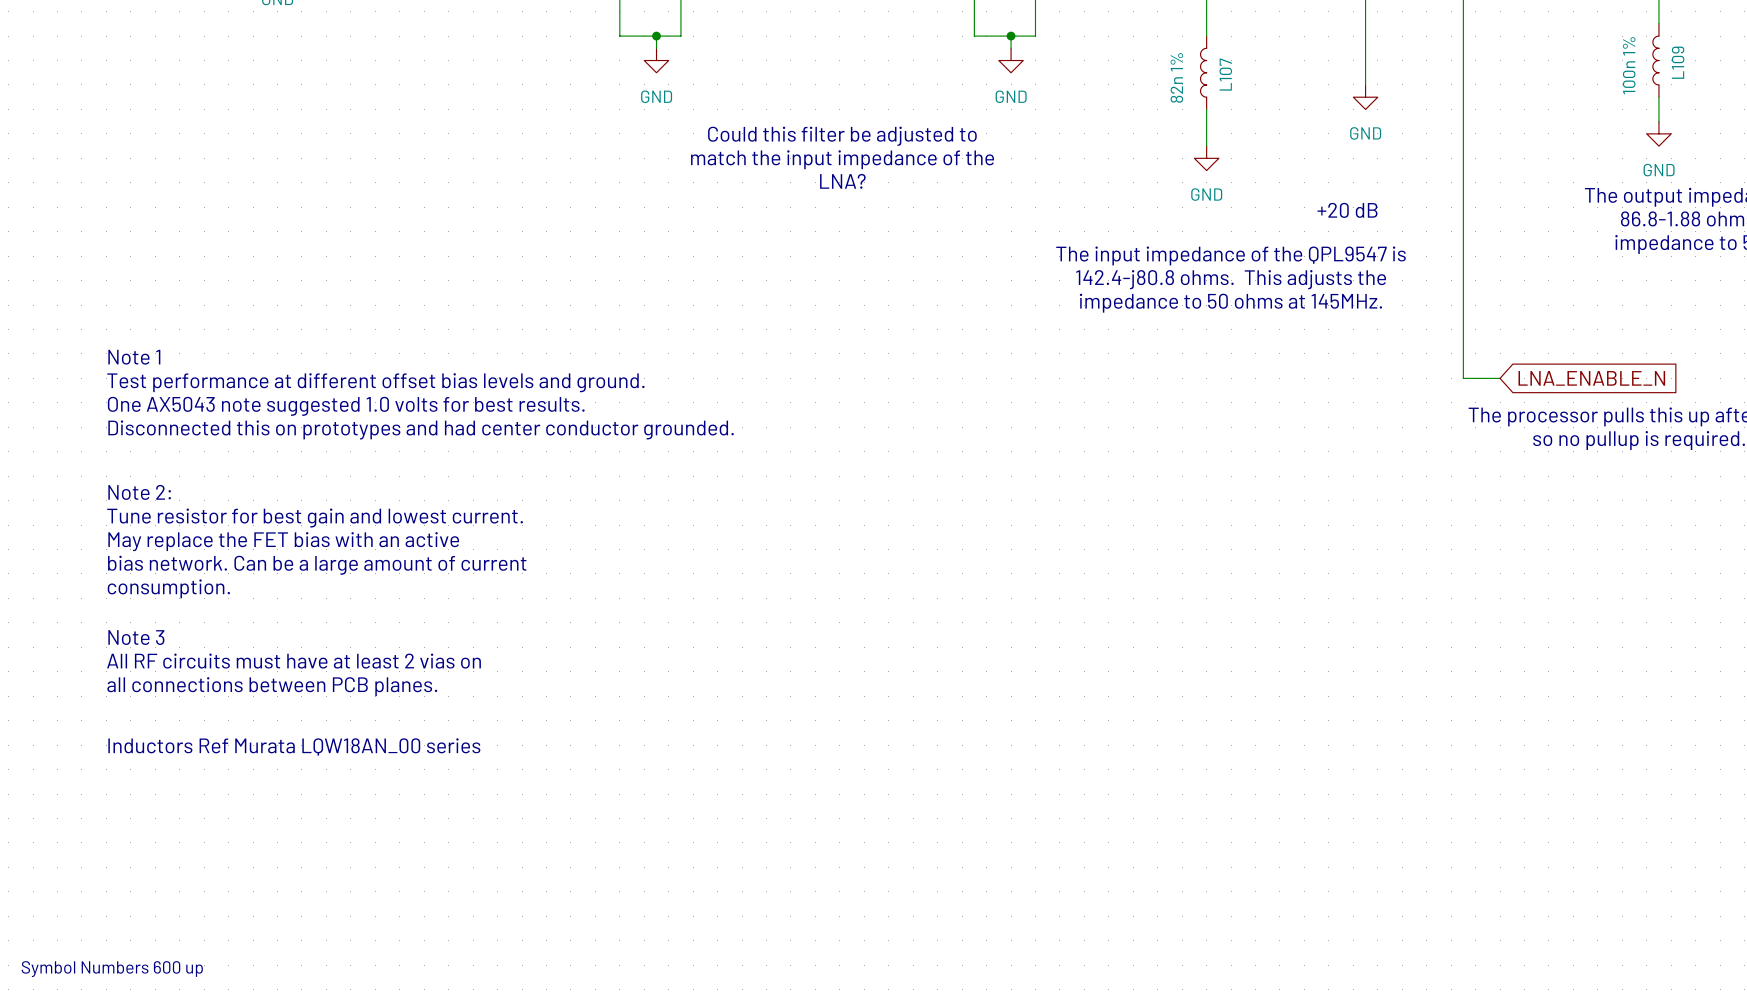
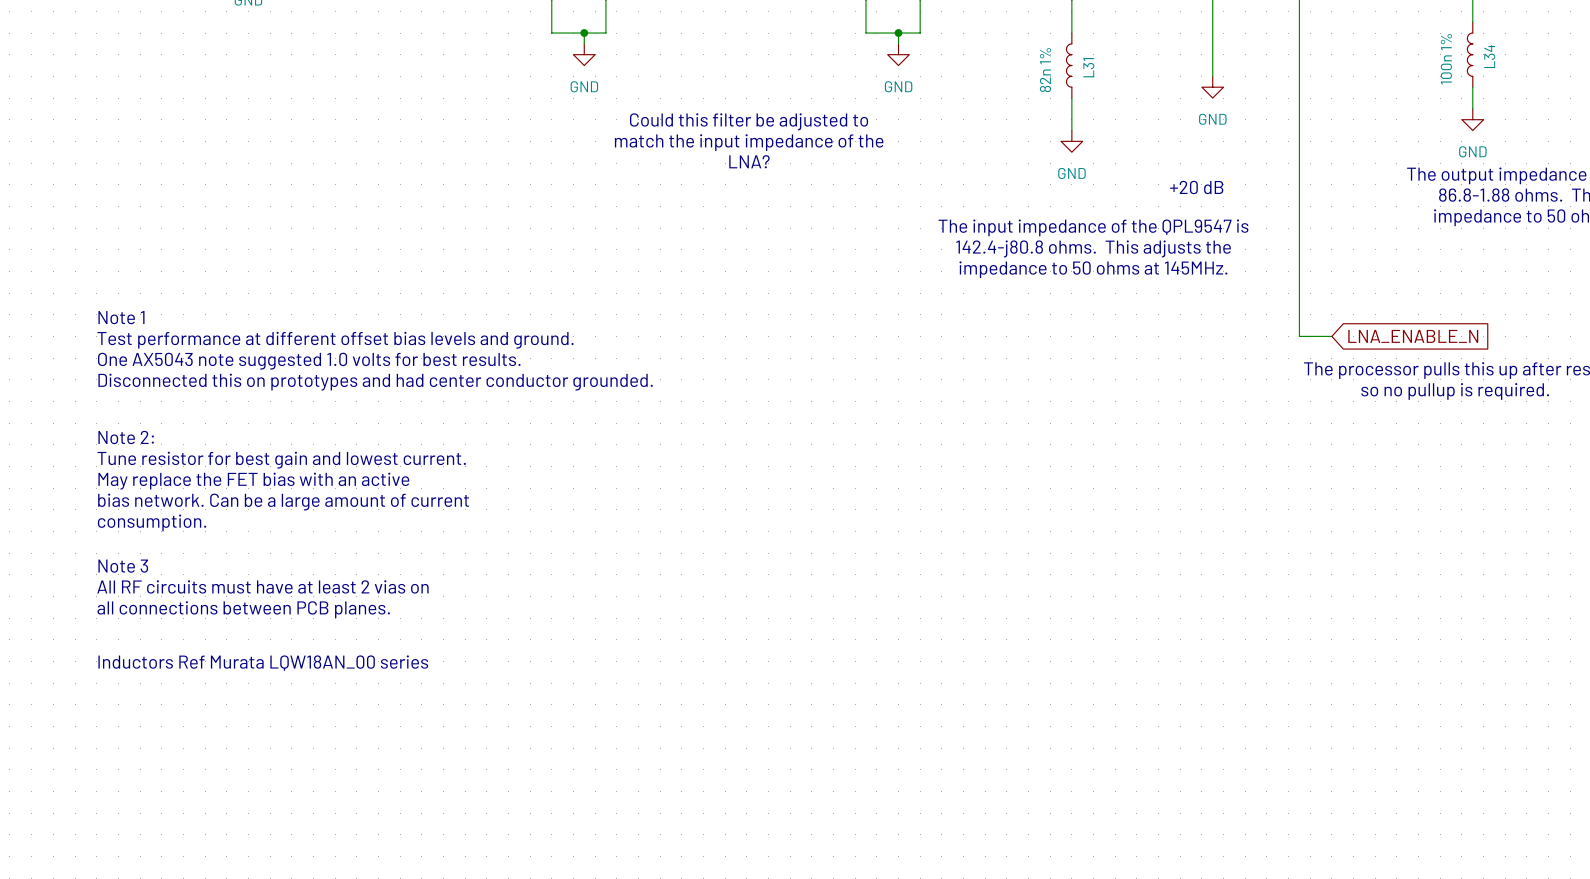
L109 name: L109 (1678, 62) -> L34 (1489, 56)
L107 name: L107 (1225, 74) -> L31 (1088, 67)
text: Symbol Numbers 600 up (112, 969) -> none

